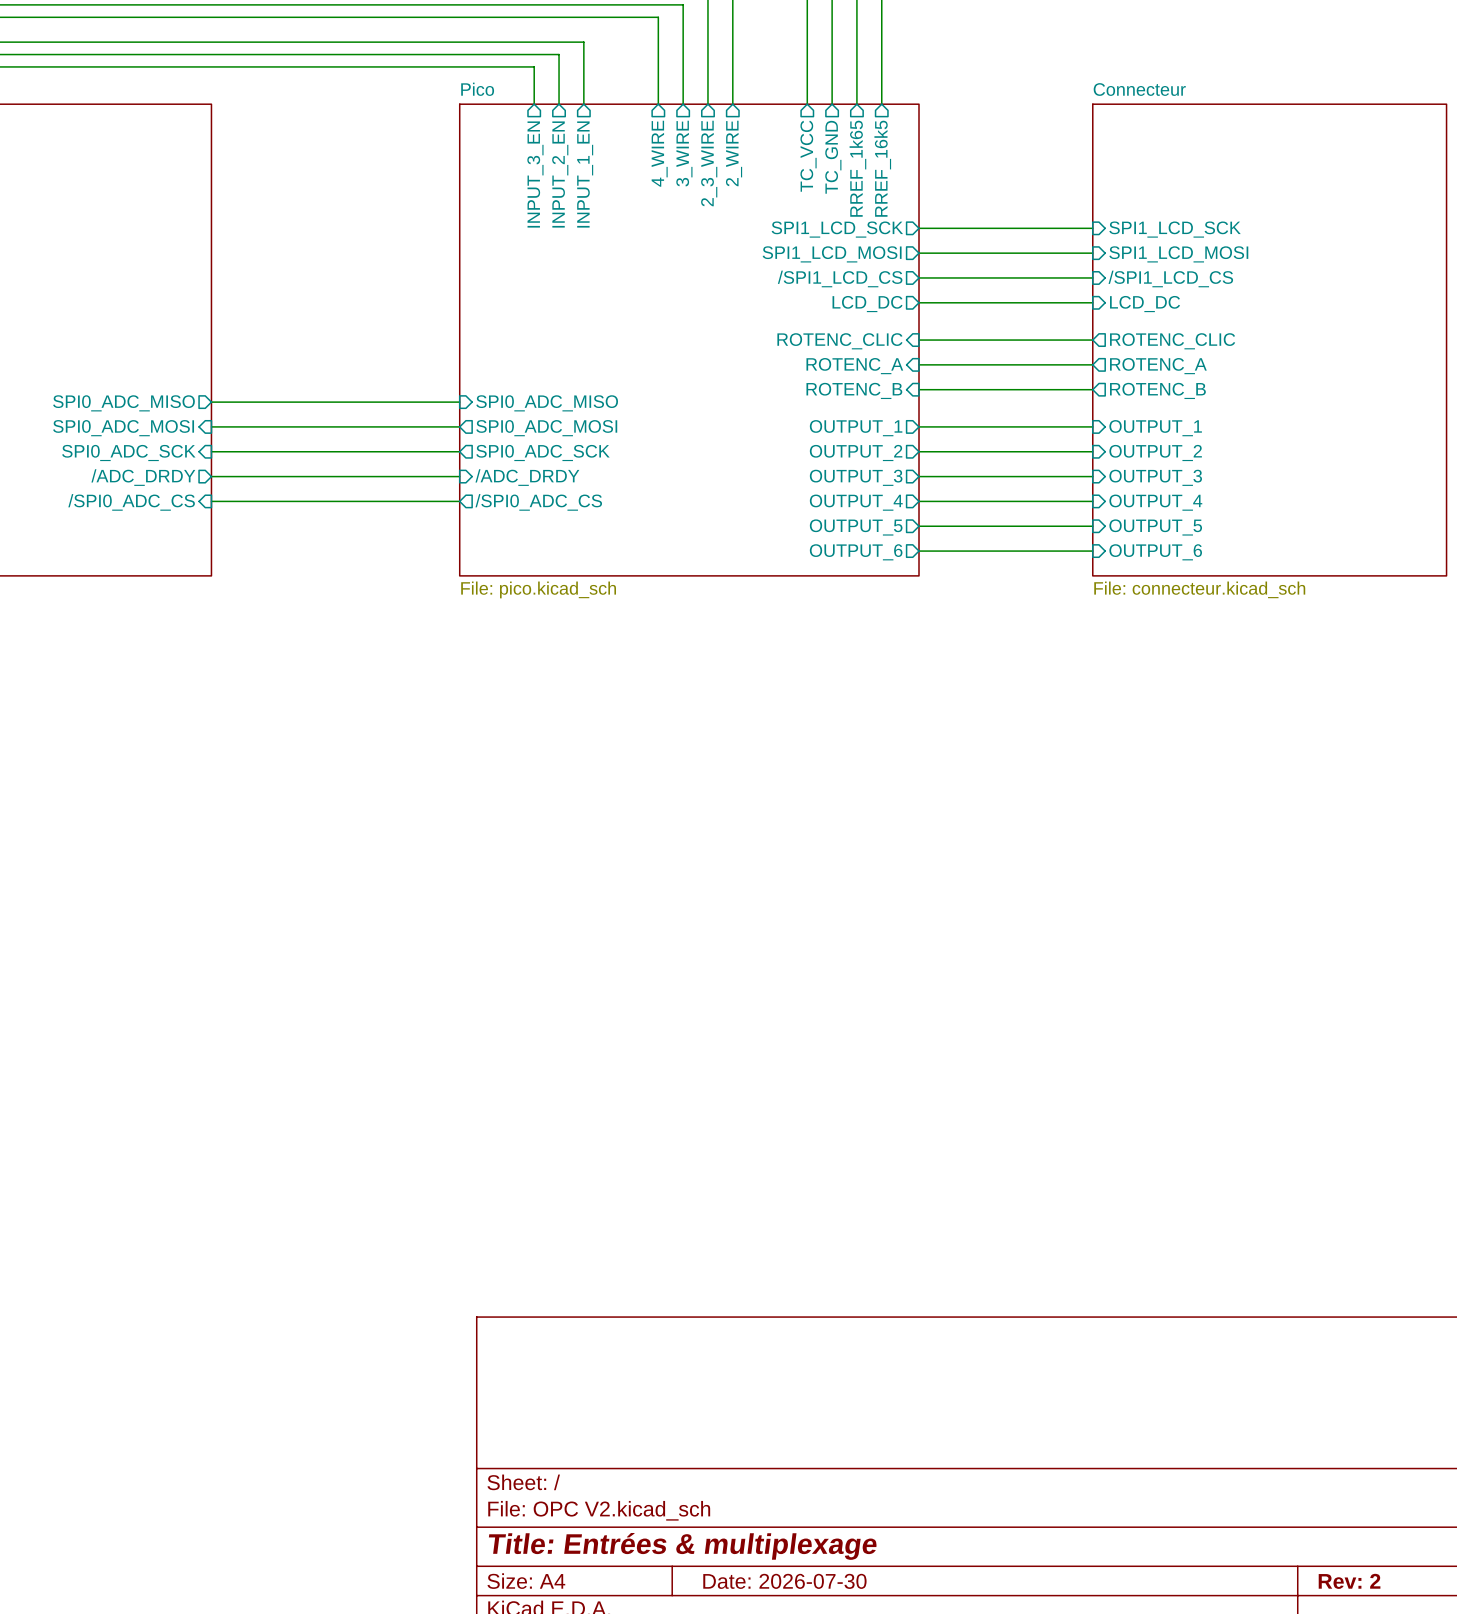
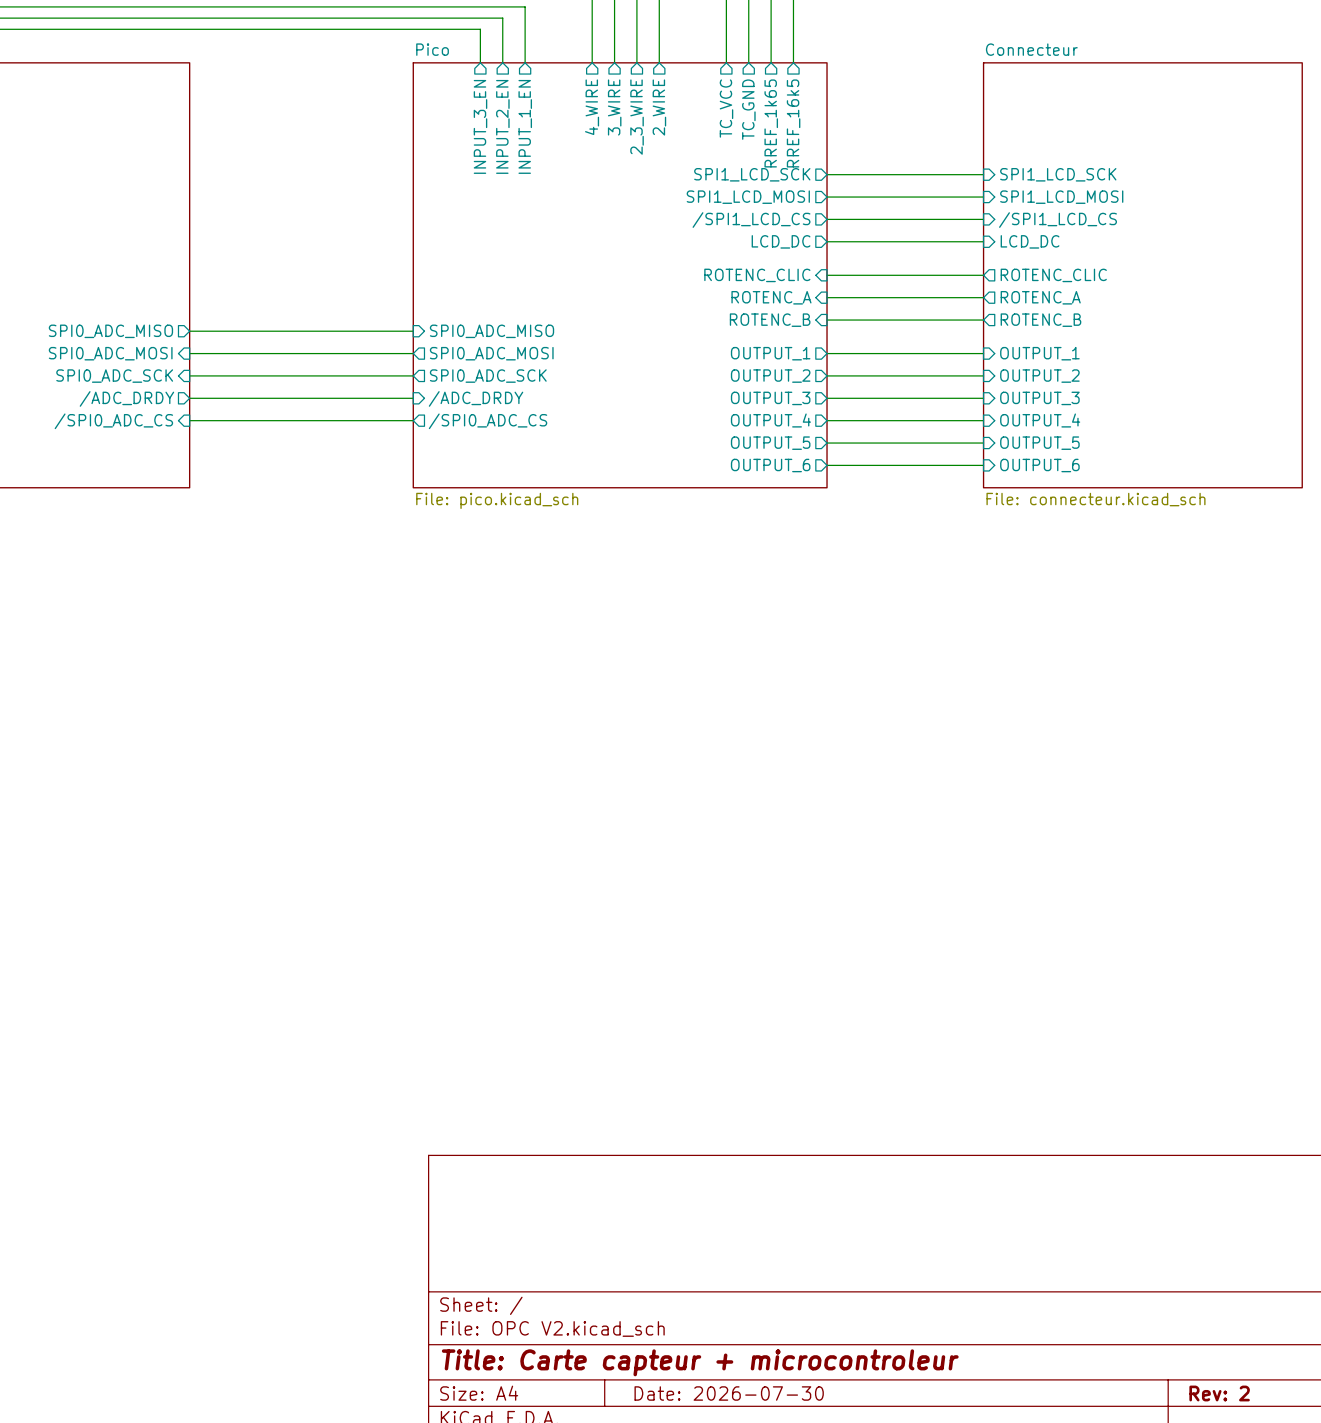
title block: Title: Entrées & multiplexage (682, 1546) -> Title: Carte capteur + microcontroleur (700, 1362)

